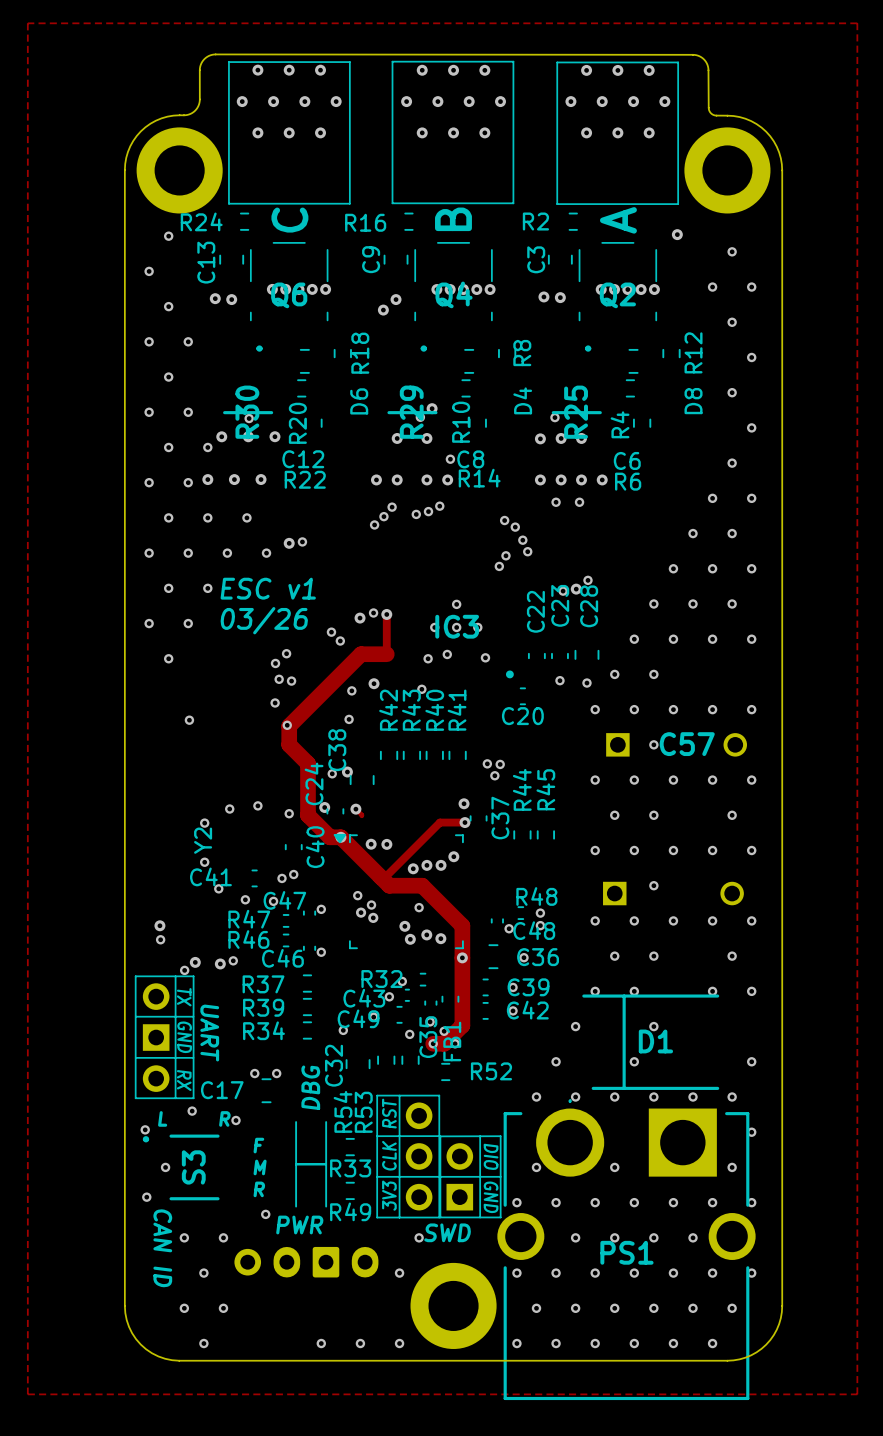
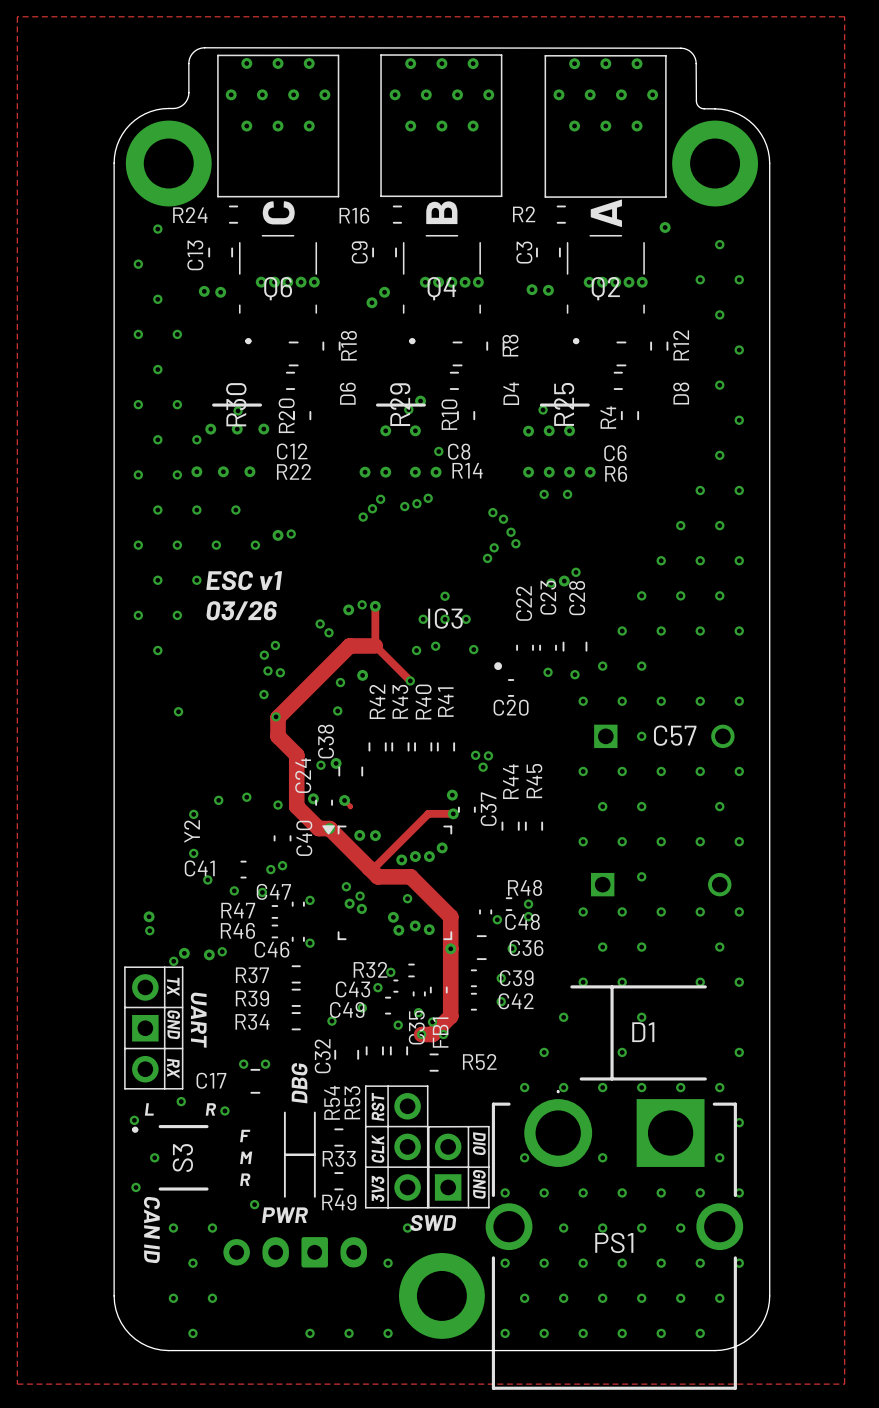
track: none -> (375, 645) (410, 680)

